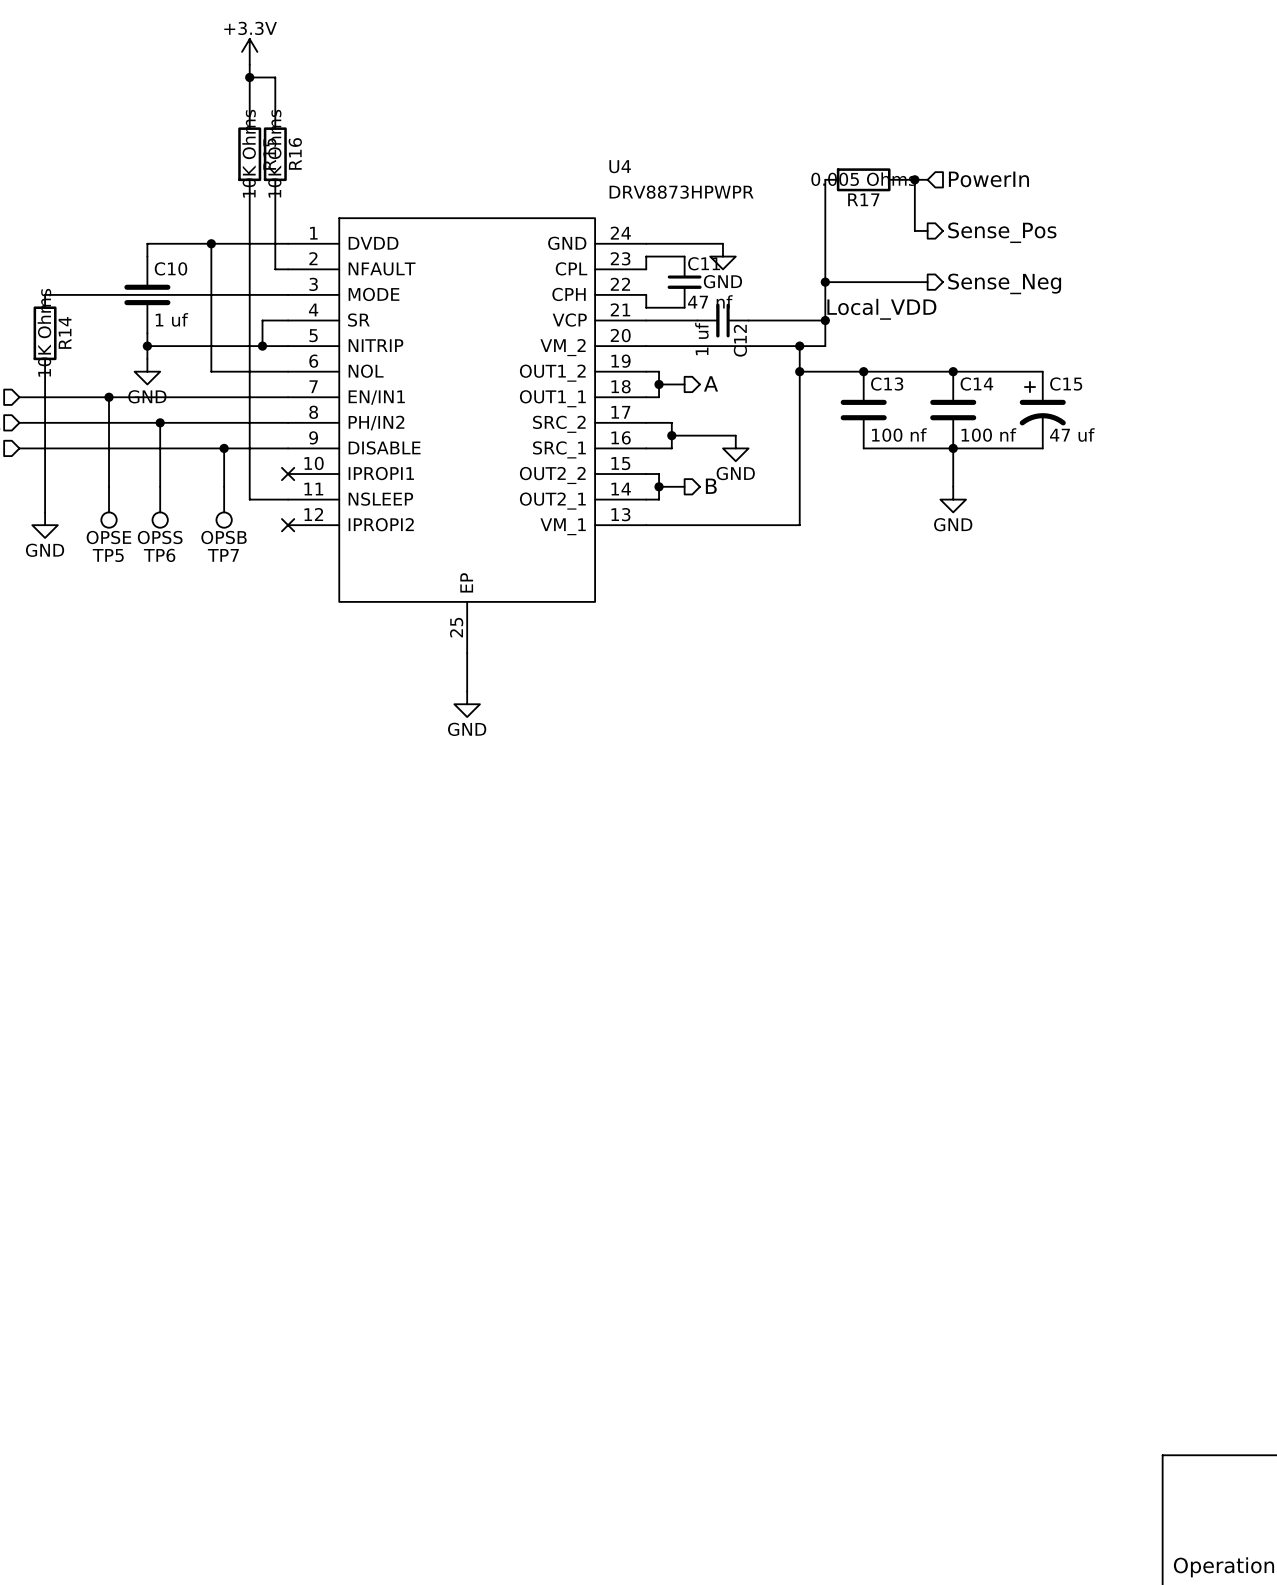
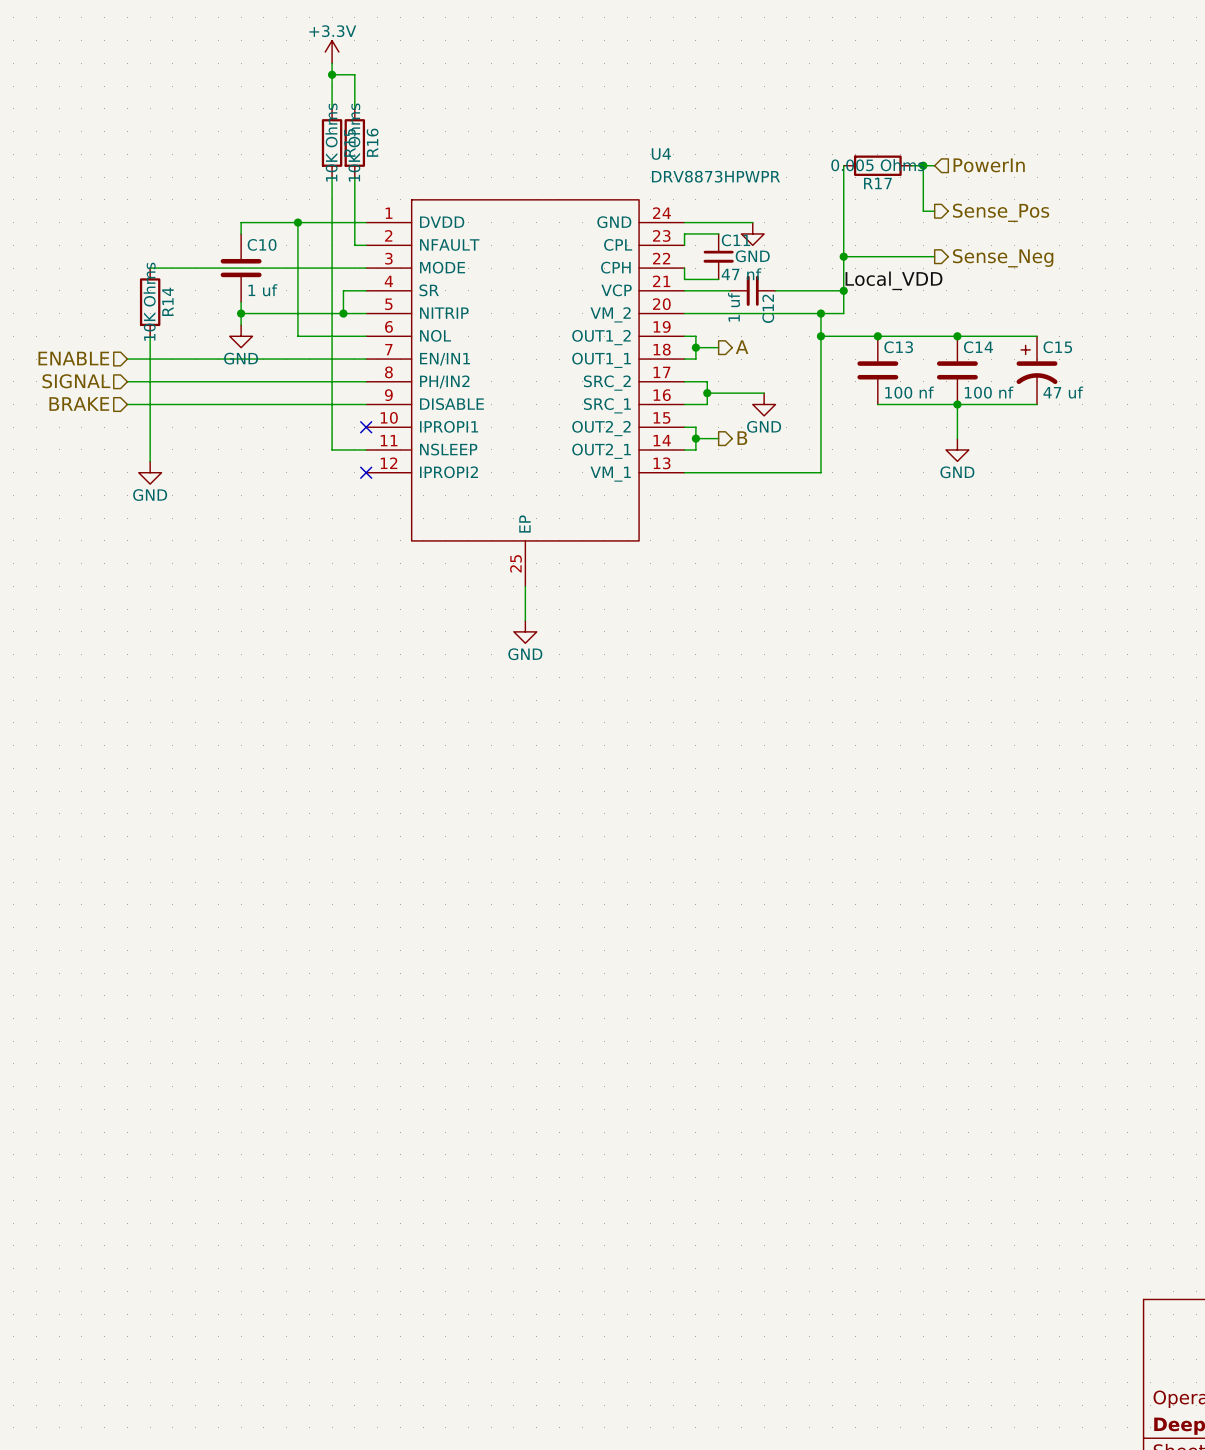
wire: (109, 397) (109, 486) -> none
junction: (109, 397) -> none
wire: (160, 422) (160, 486) -> none
junction: (160, 422) -> none
wire: (224, 448) (224, 486) -> none
junction: (224, 448) -> none
TP5: OPSE (109, 507) -> none
TP6: OPSS (160, 507) -> none
TP7: OPSB (224, 507) -> none

